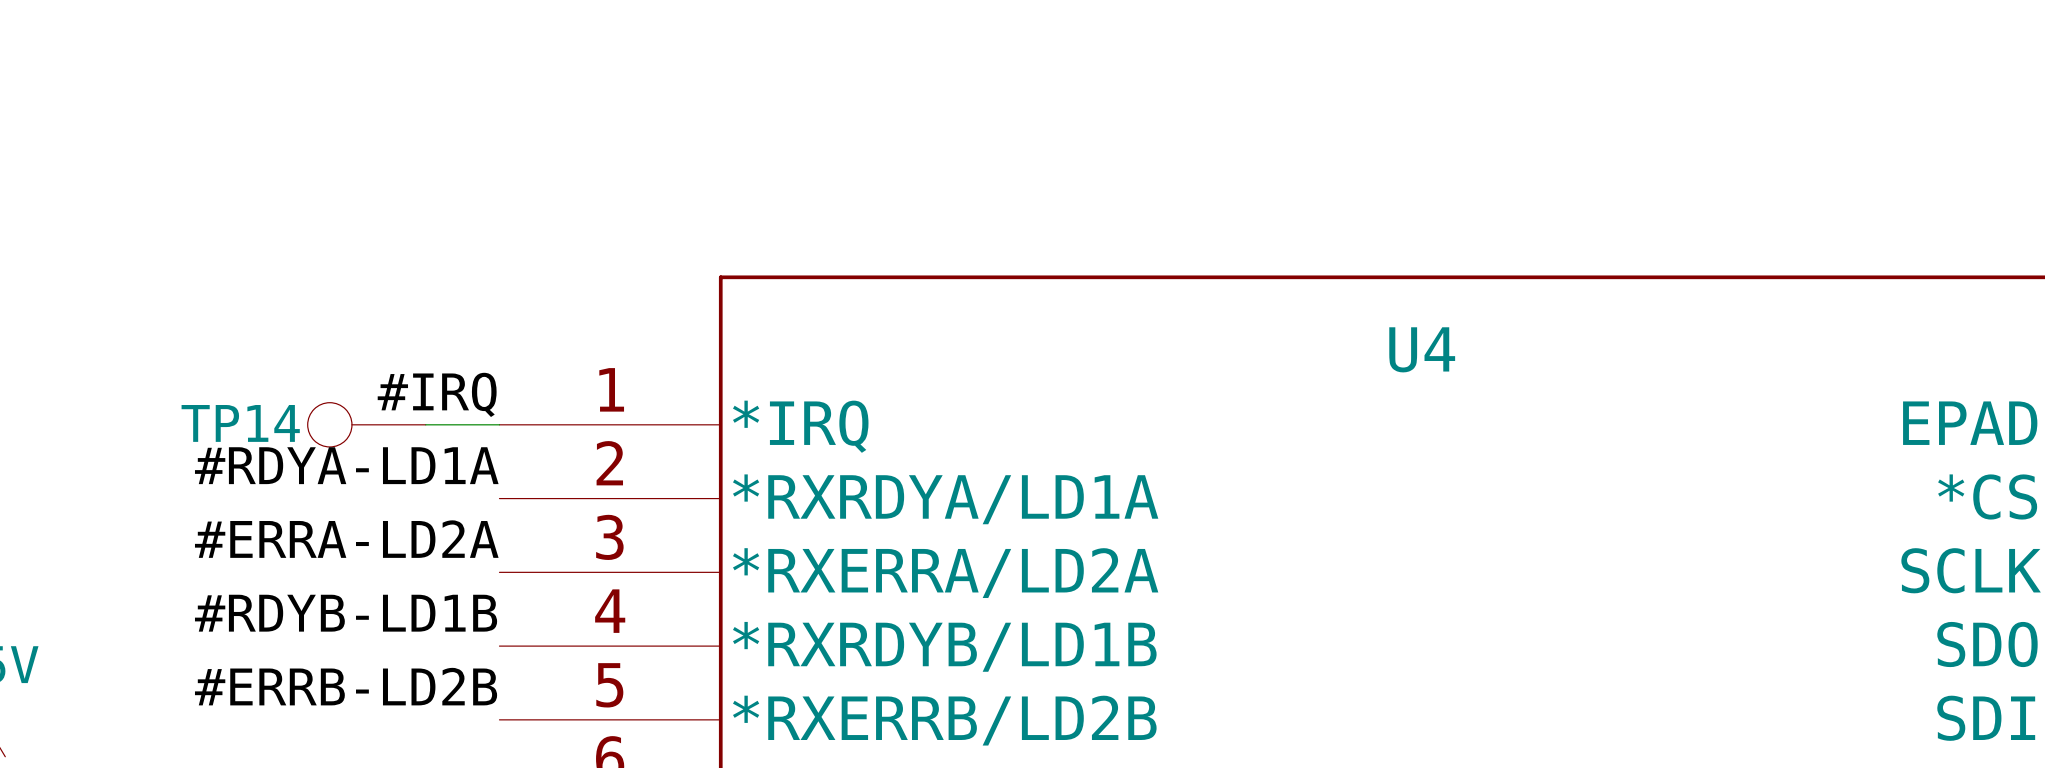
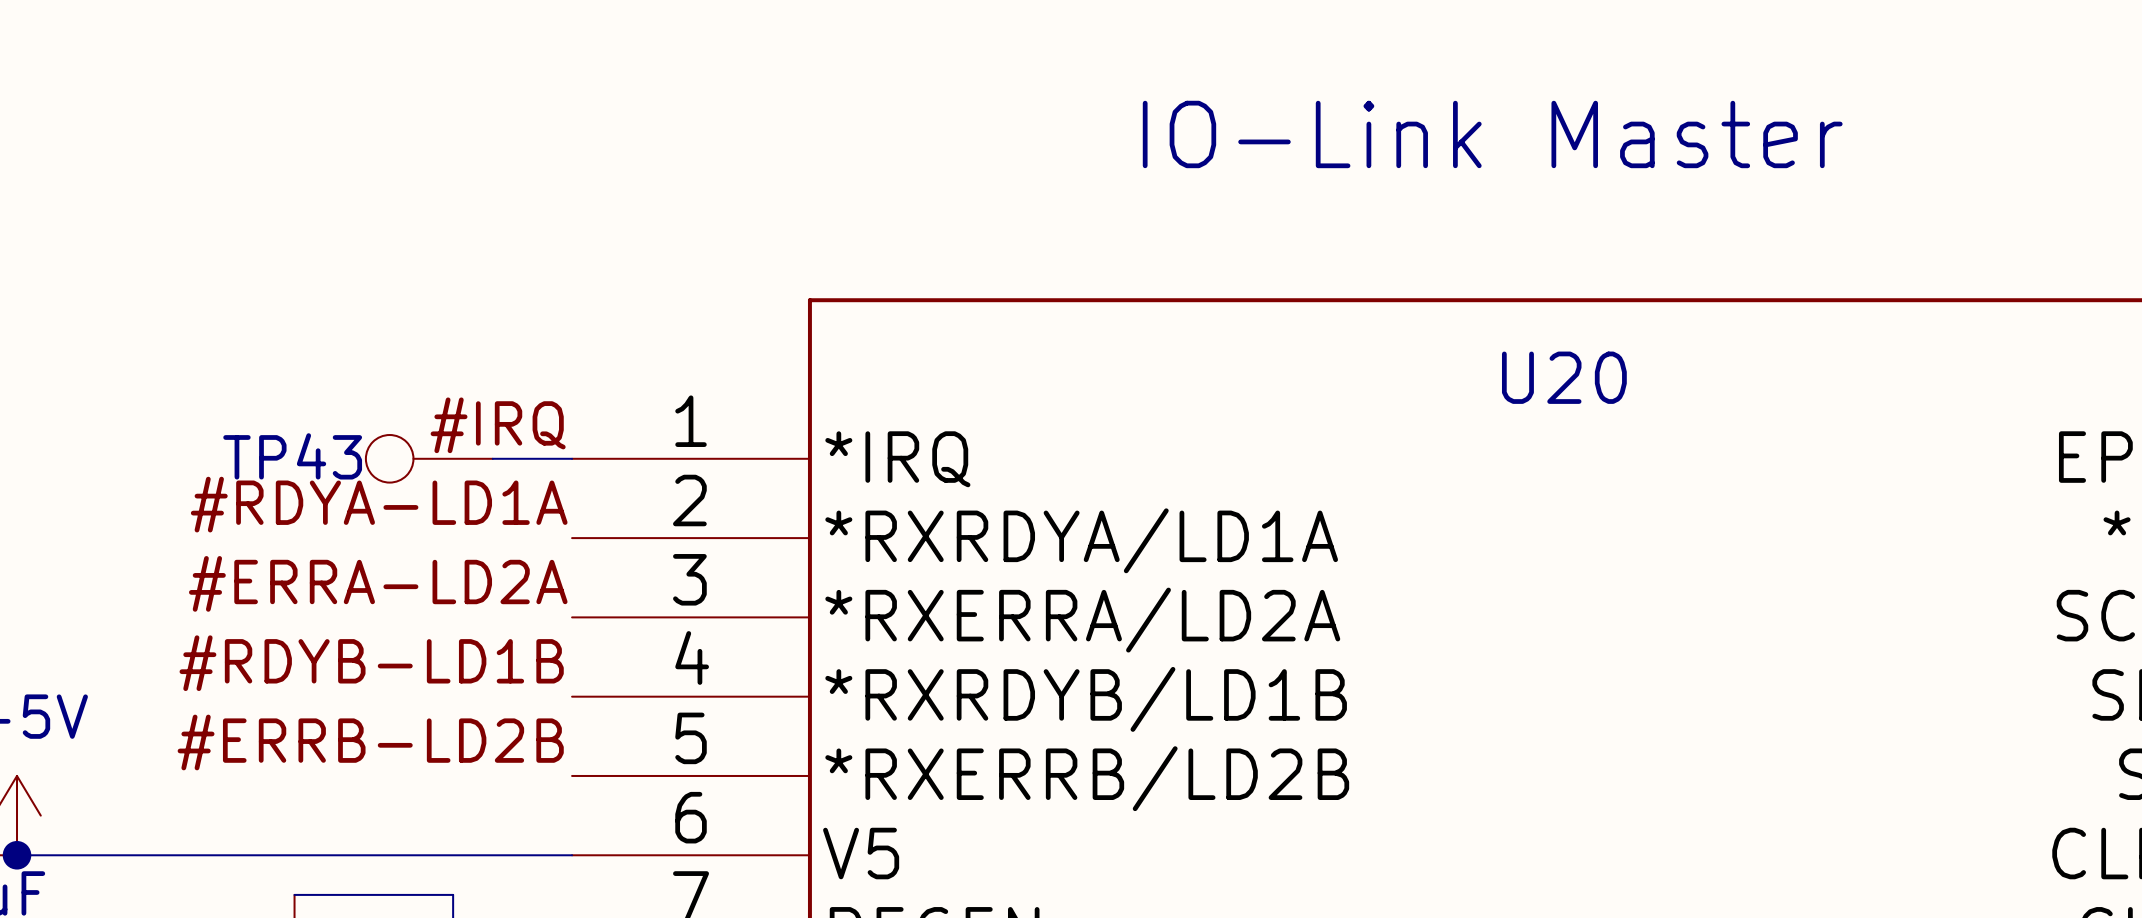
text: none -> IO-Link Master (1492, 134)
U4 name: U4 (1422, 349) -> U20 (1564, 377)
TP14 name: TP14 (240, 423) -> TP43 (292, 456)

